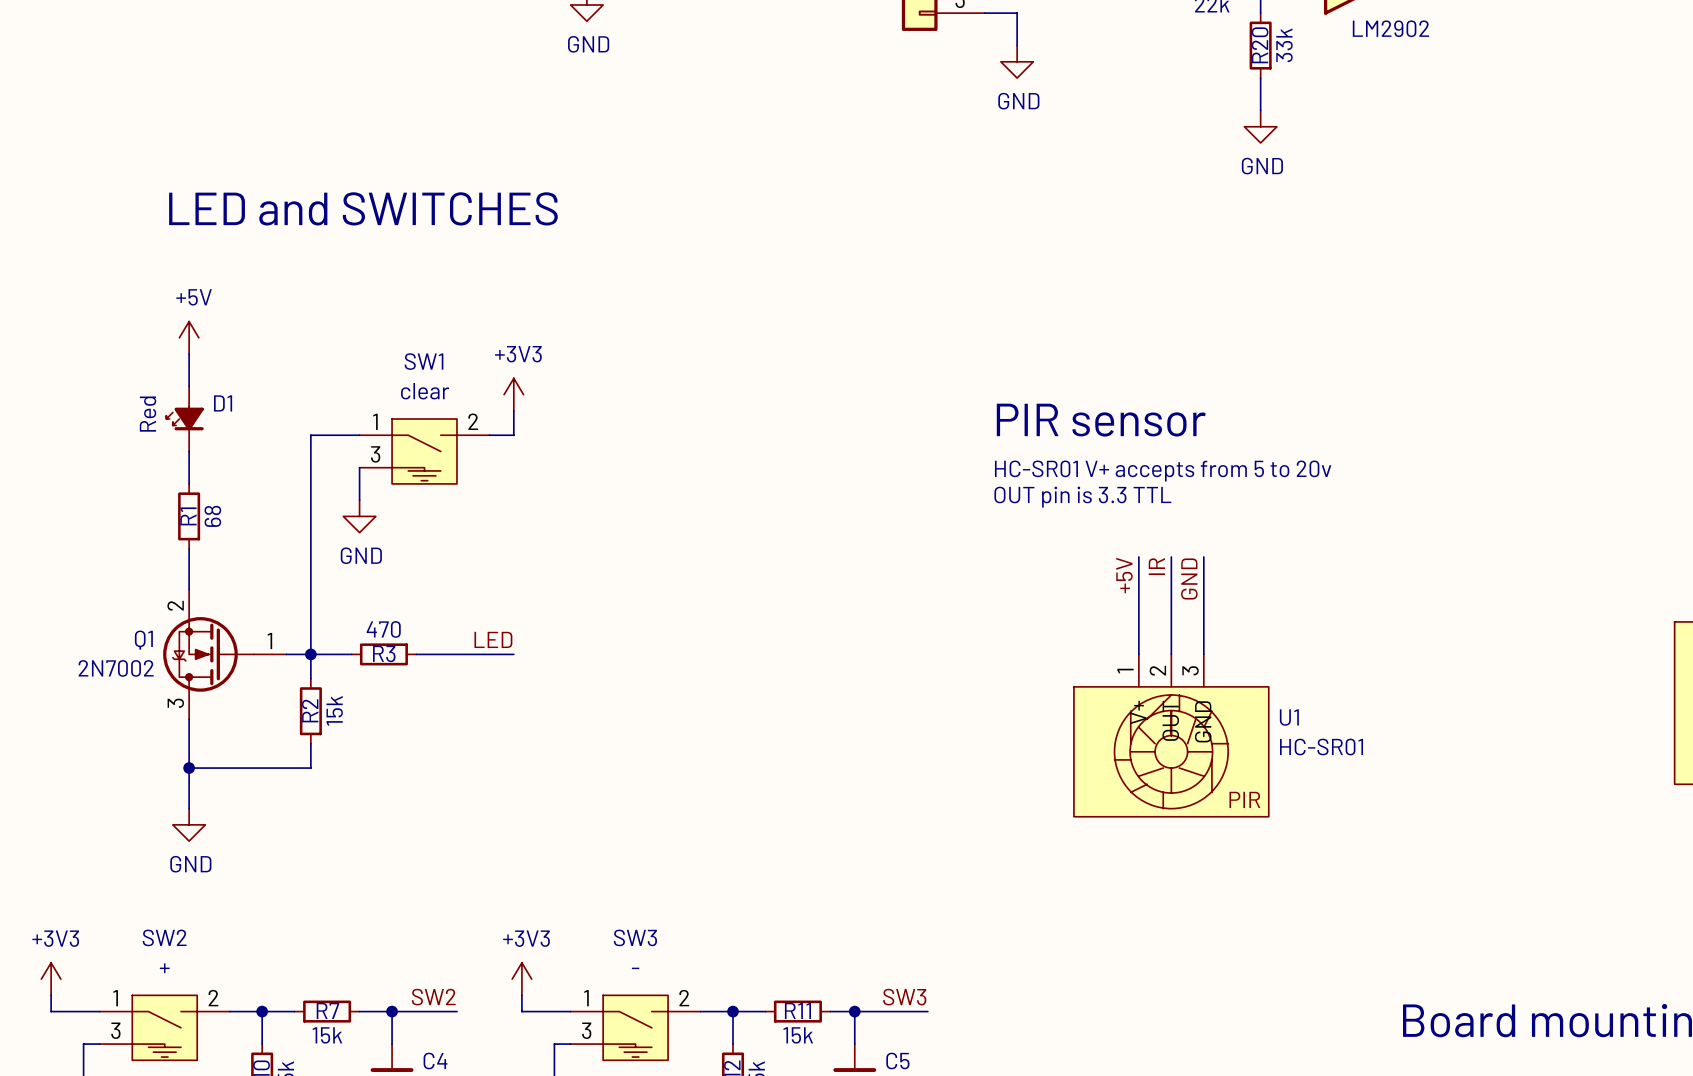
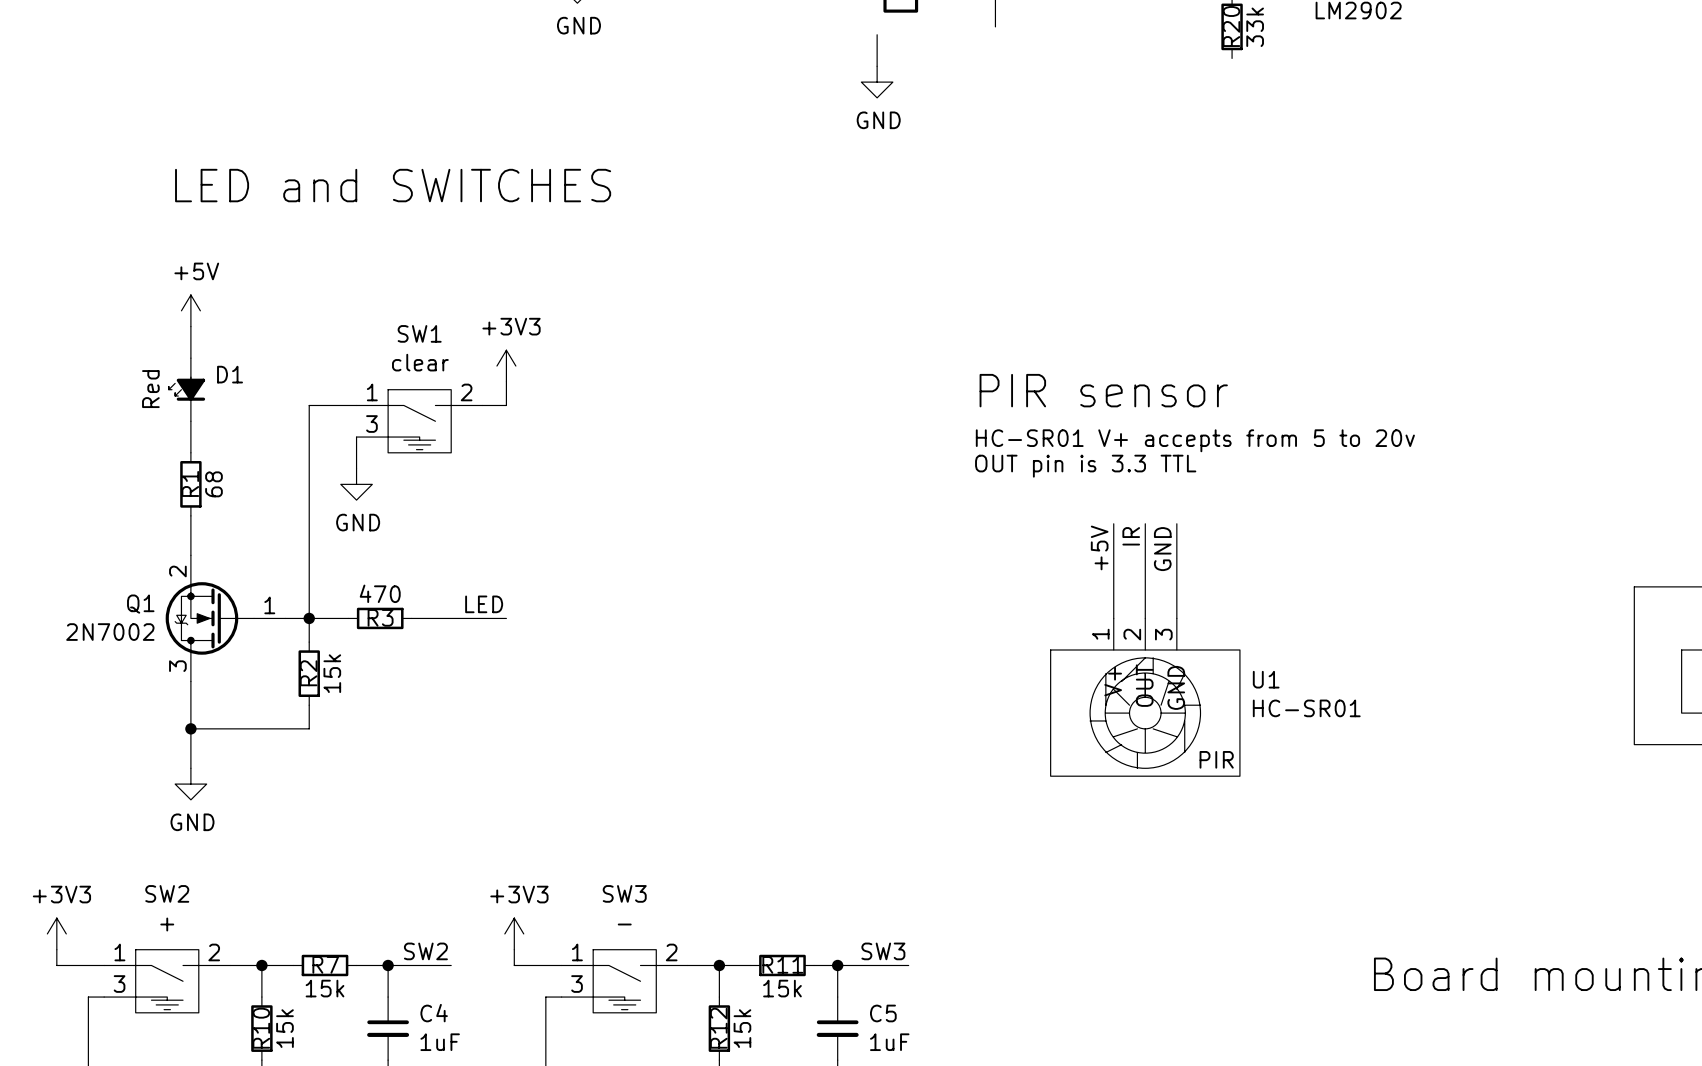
wire: none -> (877, 34) (877, 66)
power symbol position: GND (1017, 61) -> GND (877, 82)
wire: (1260, 78) (1260, 110) -> none
power symbol: GND (1260, 126) -> none

